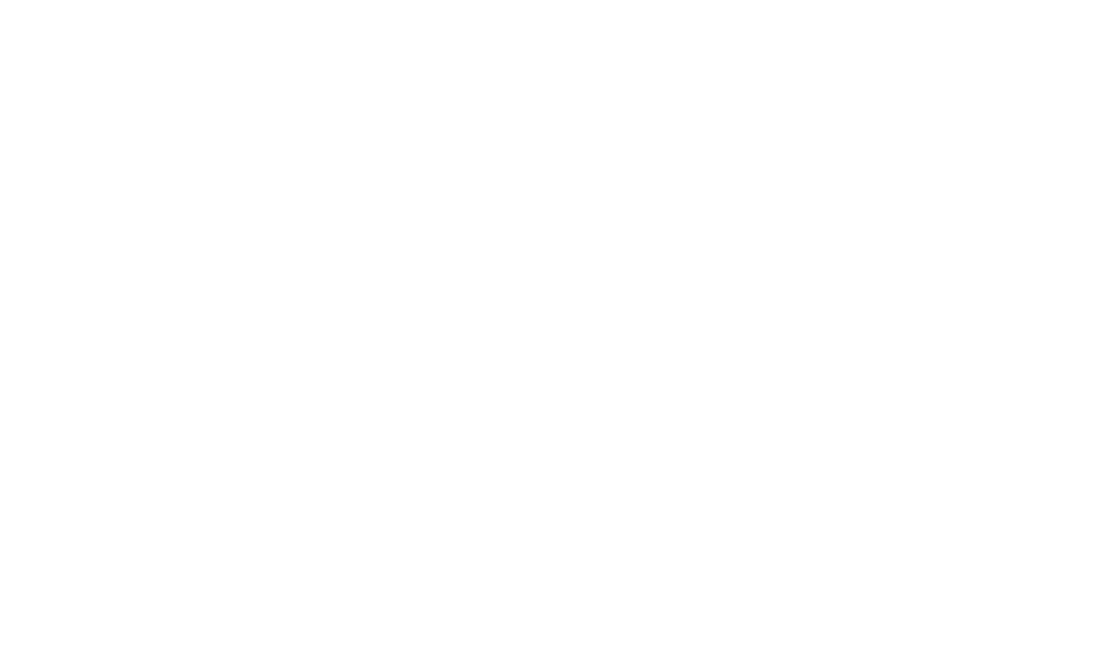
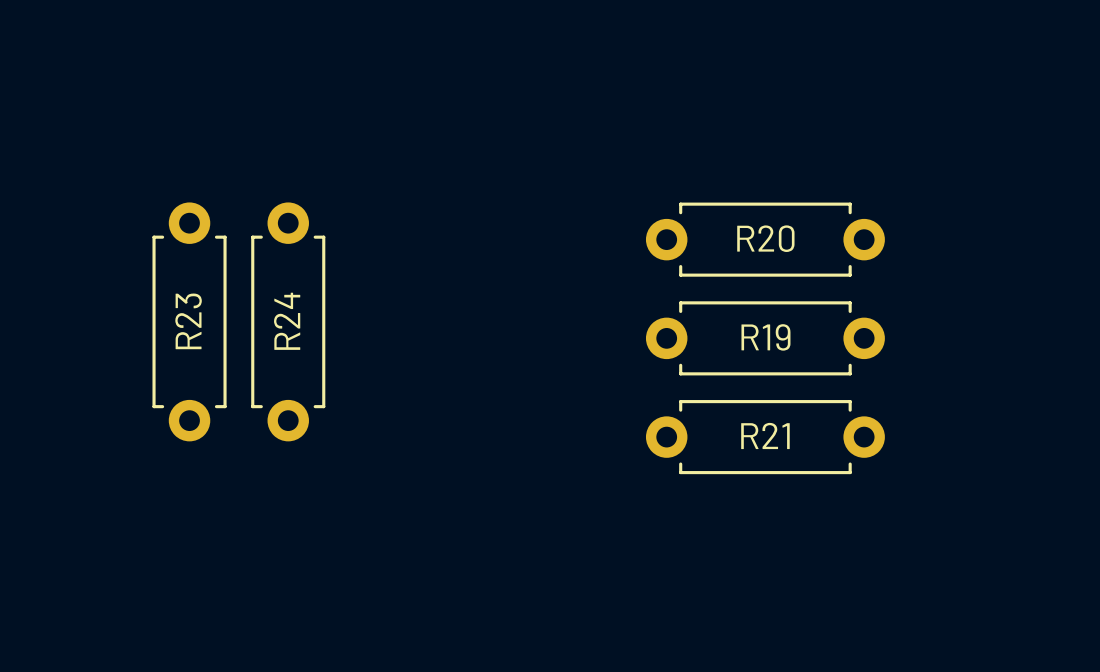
R20: none -> (765, 239)
R23: none -> (189, 321)
R24: none -> (288, 321)
R19: none -> (765, 338)
R21: none -> (765, 437)

